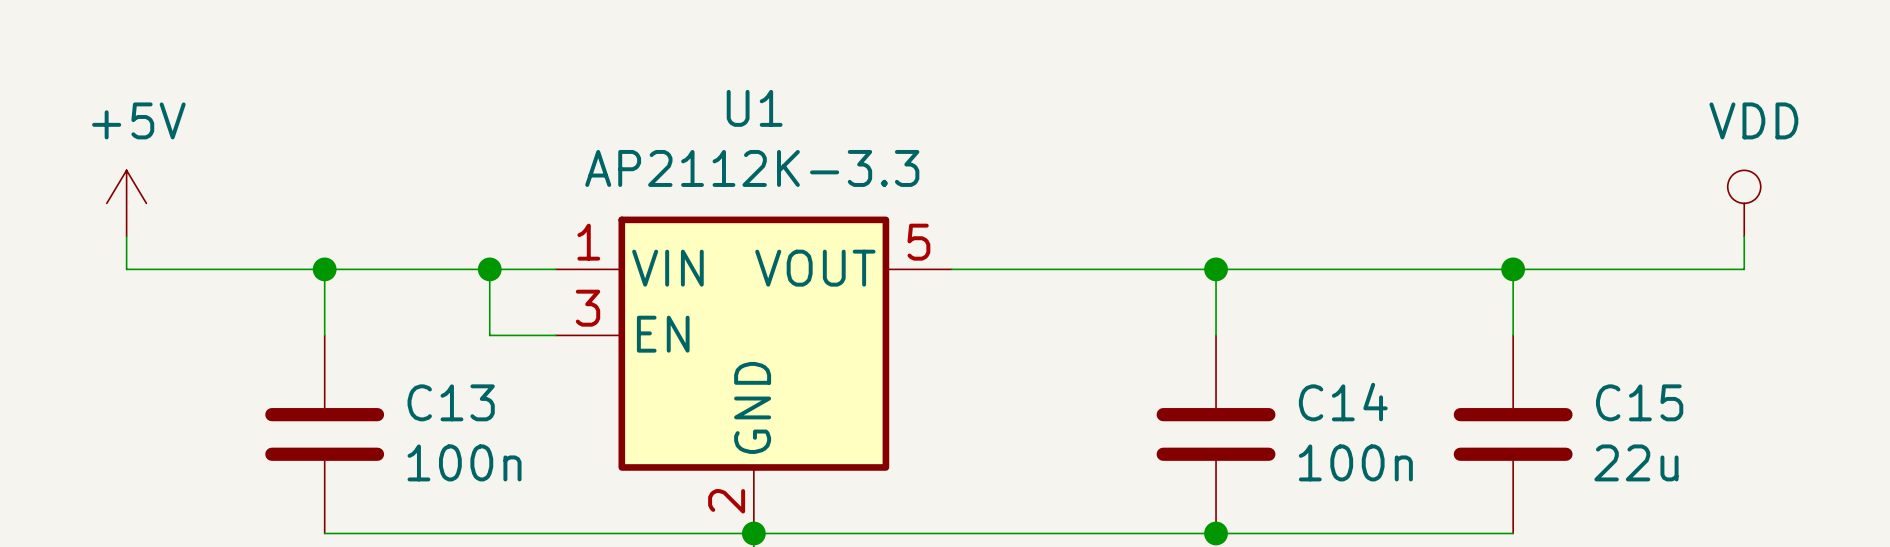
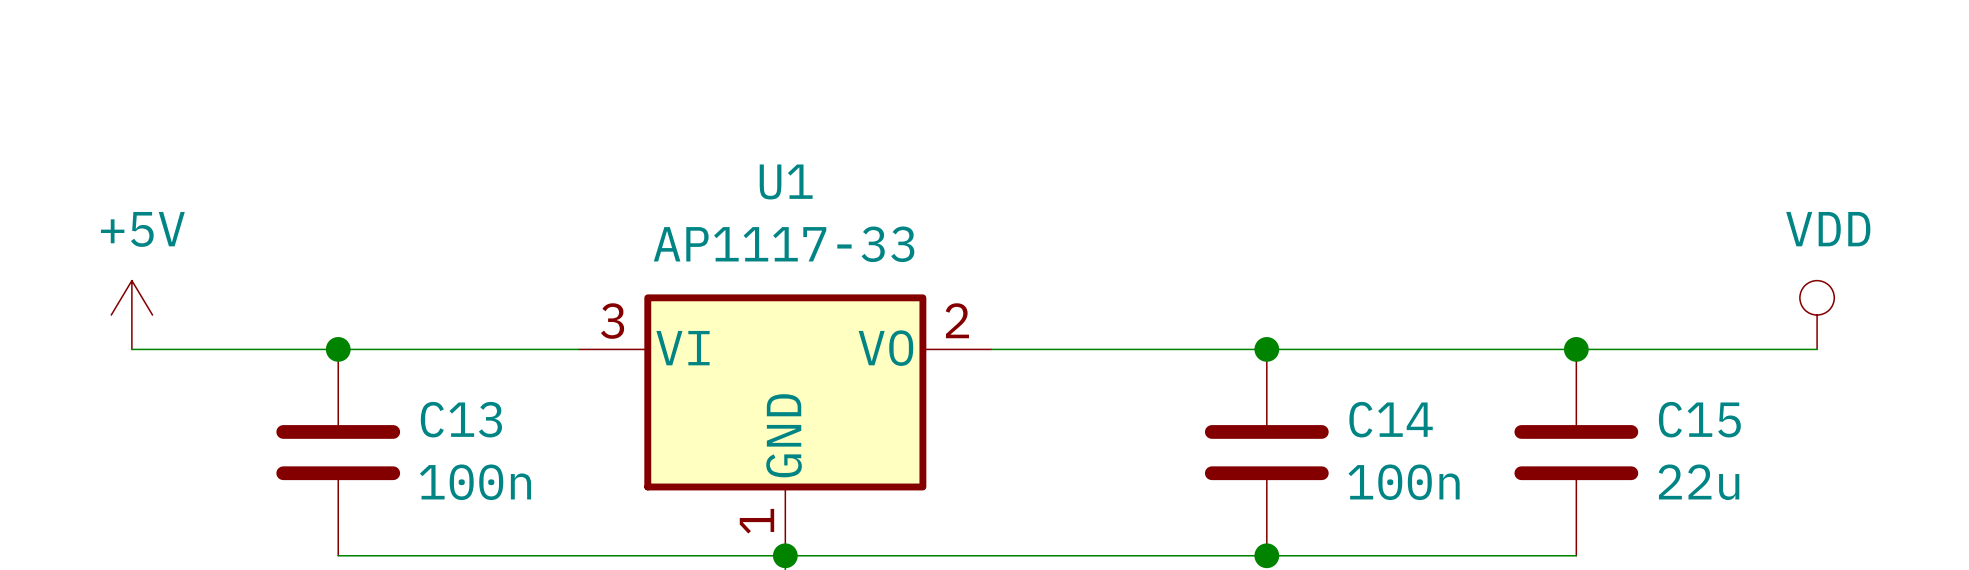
U1 value: AP2112K-3.3 (752, 168) -> AP1117-33 (784, 244)
power symbol position: +5V (126, 203) -> +5V (131, 315)
power symbol position: VDD (1744, 203) -> VDD (1817, 315)
U1 symbol: [555, 216, 952, 534] -> [578, 294, 992, 556]
wire: (126, 236) (126, 269) (555, 269) -> none
wire: (1744, 236) (1744, 269) (951, 269) -> none
wire: (324, 269) (324, 335) -> none
junction position: (324, 269) -> (338, 349)
wire: (489, 269) (489, 335) -> (131, 349) (510, 349)
junction: (489, 269) -> none
wire: (1216, 269) (1216, 335) -> none
junction position: (1216, 269) -> (1266, 349)
wire: (1513, 269) (1513, 335) -> none
junction position: (1513, 269) -> (1576, 349)
wire: none -> (991, 349) (1817, 349)

